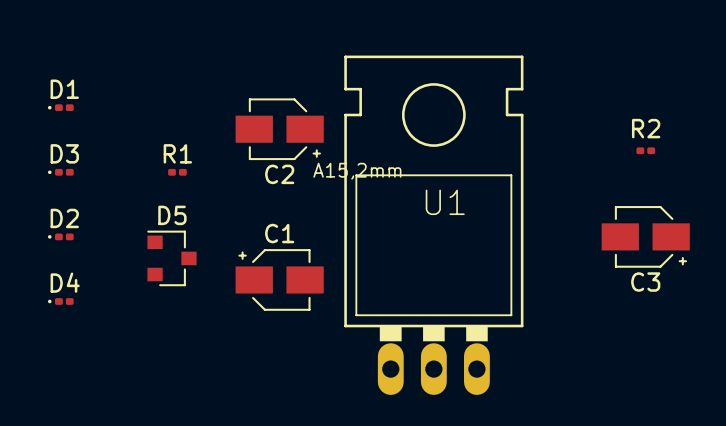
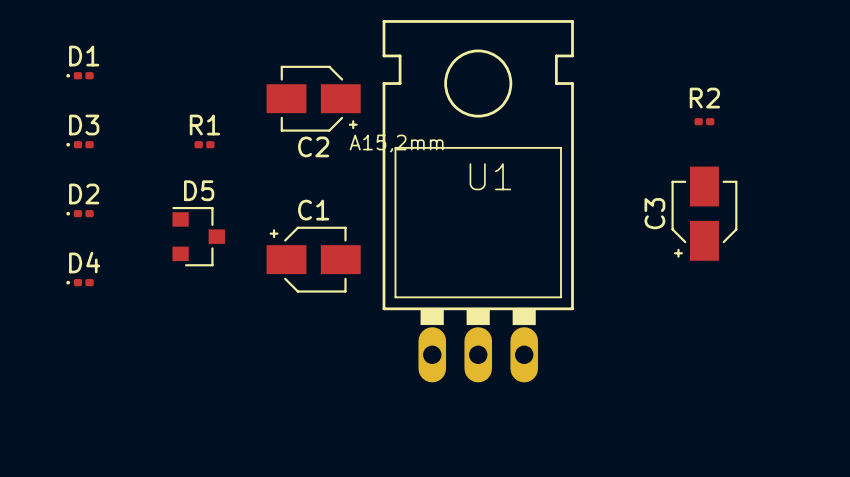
C3 rotation: 0° (645, 236) -> 90° clockwise (704, 213)

